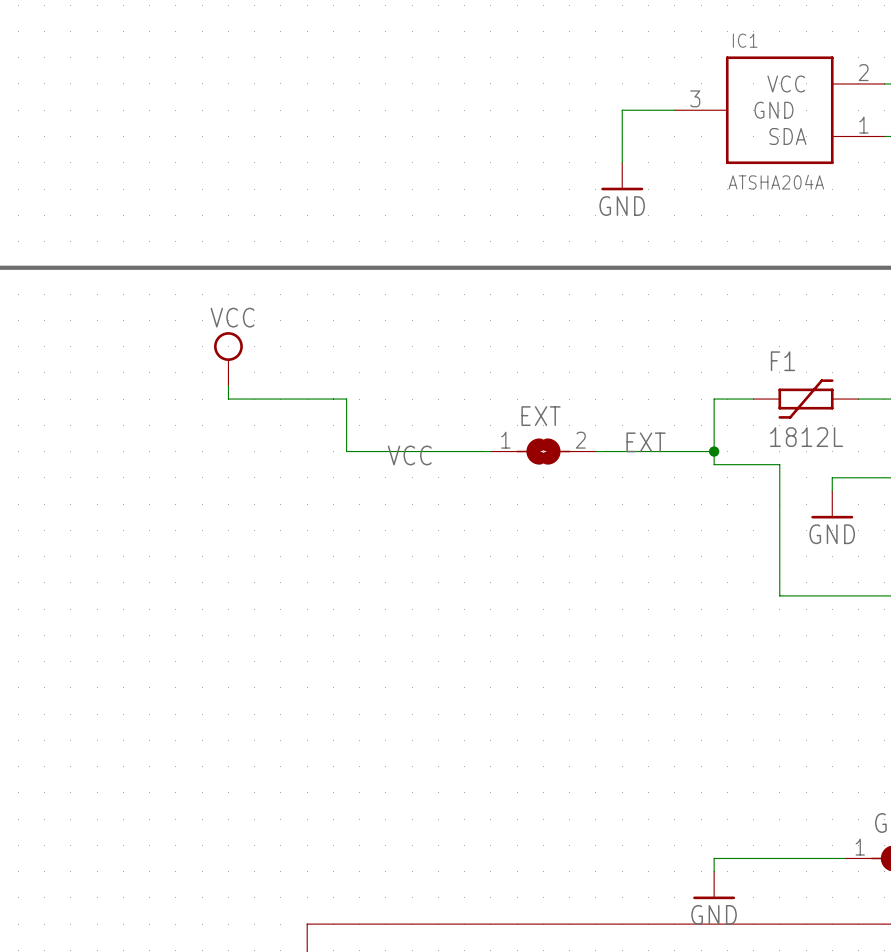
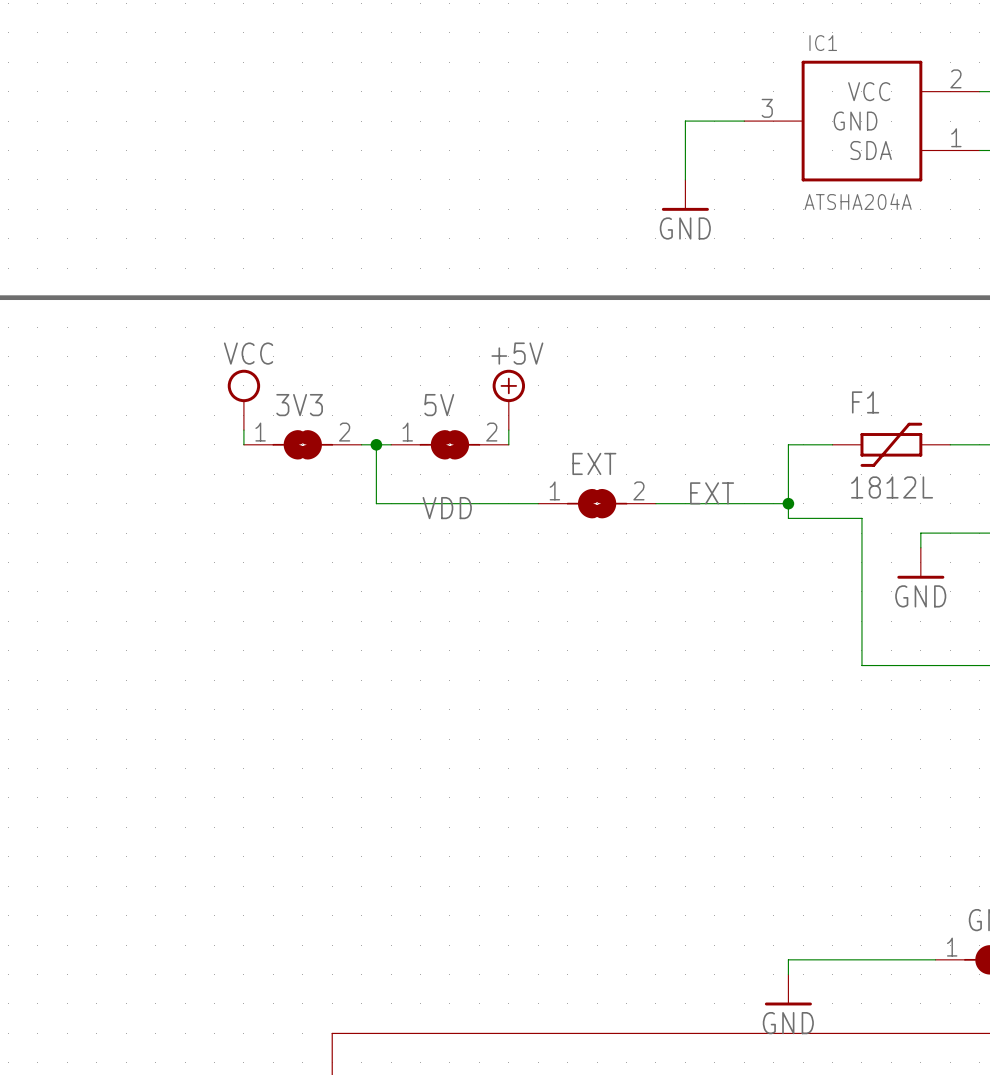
power symbol: none -> +5V (508, 399)
wire: none -> (508, 430) (508, 444)
3V3: none -> (302, 444)
wire: none -> (376, 444) (391, 444)
junction: none -> (376, 444)
5V: none -> (449, 444)
label: VCC (409, 455) -> VDD (447, 508)

